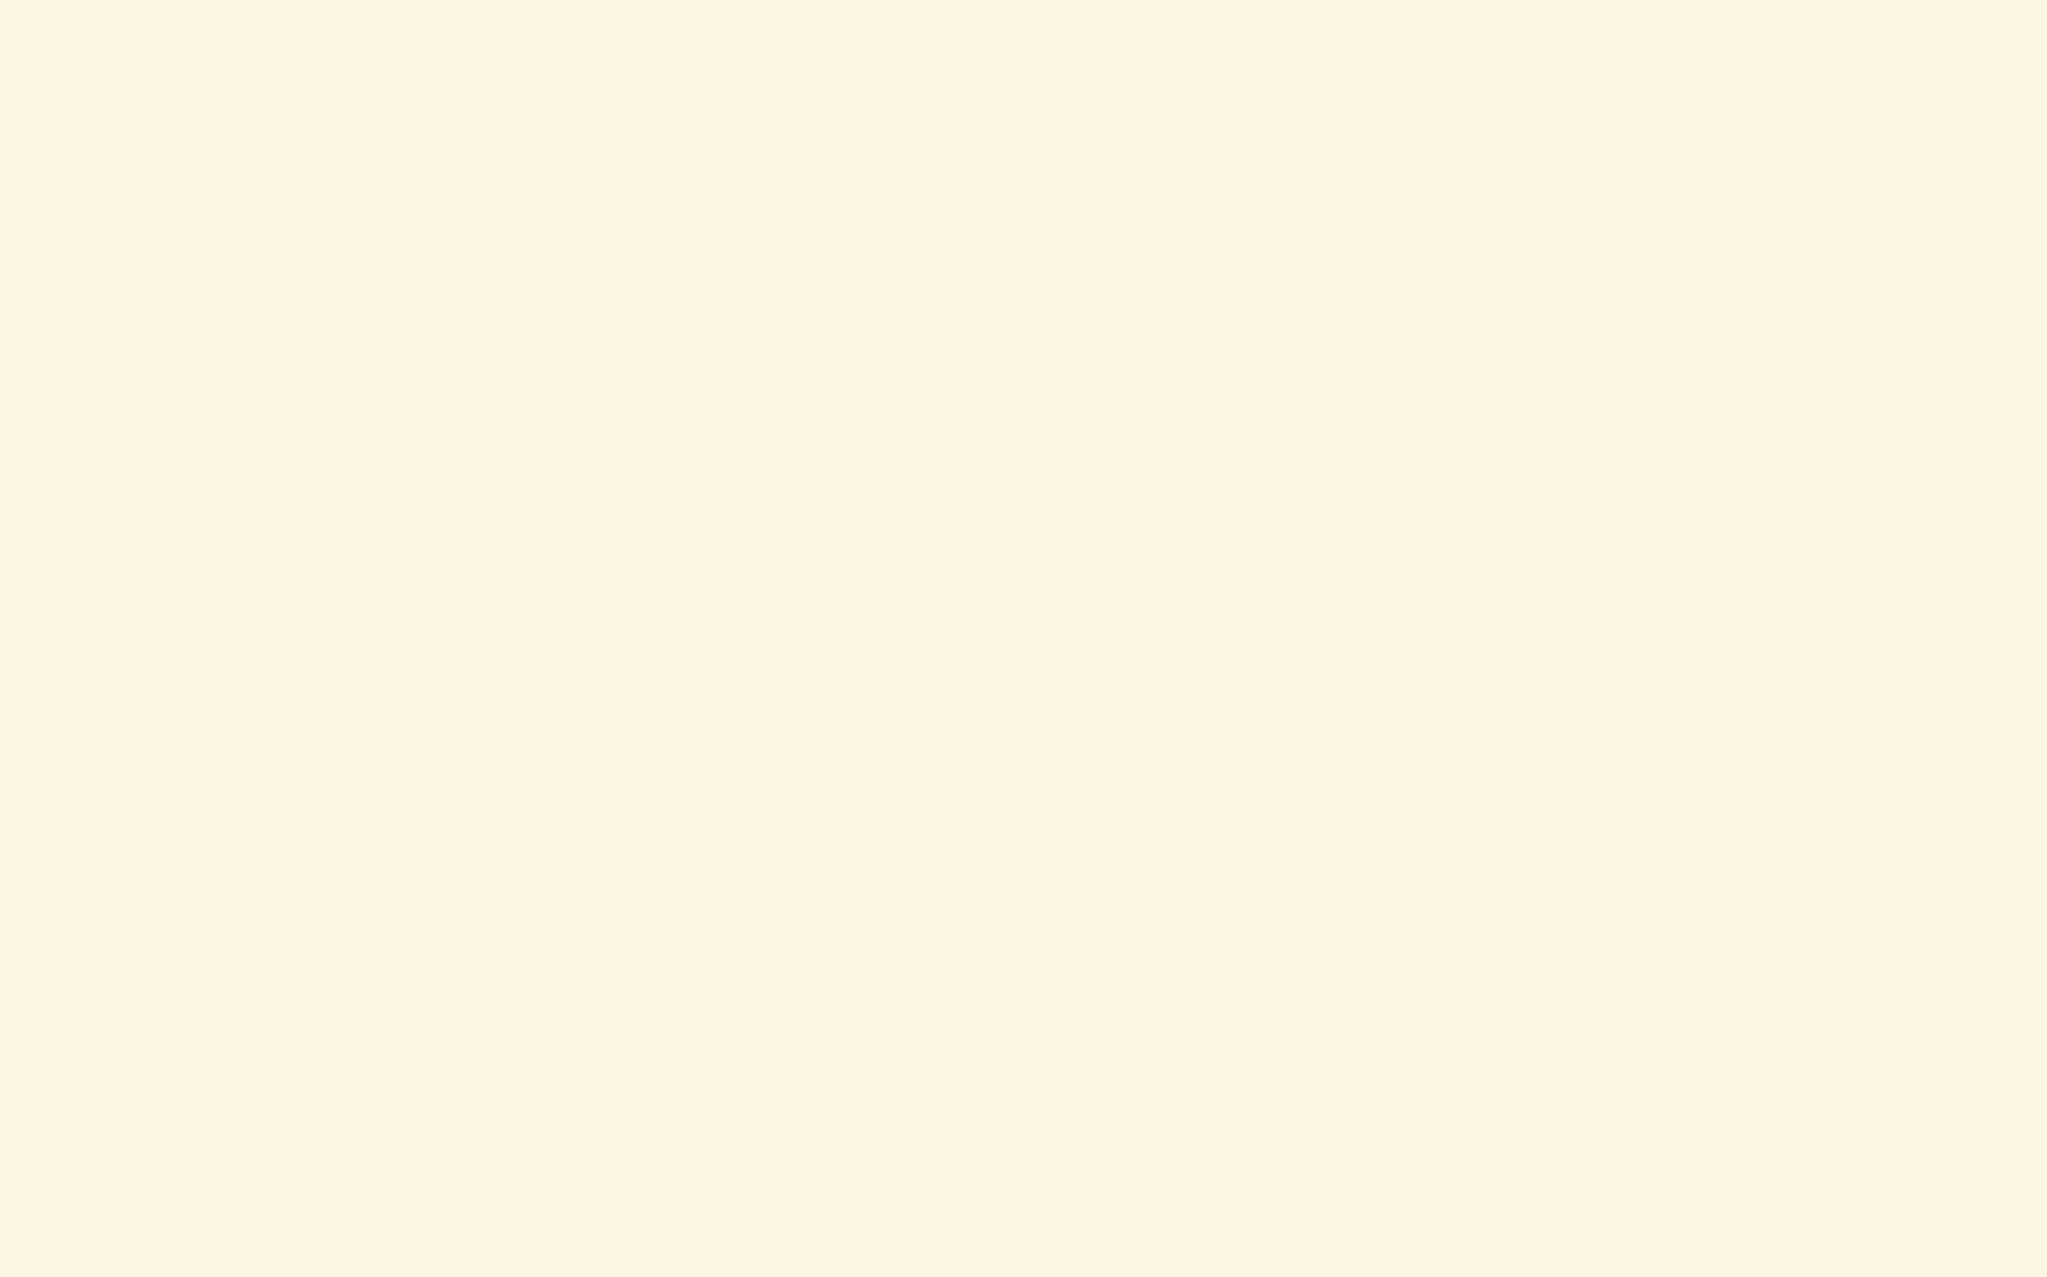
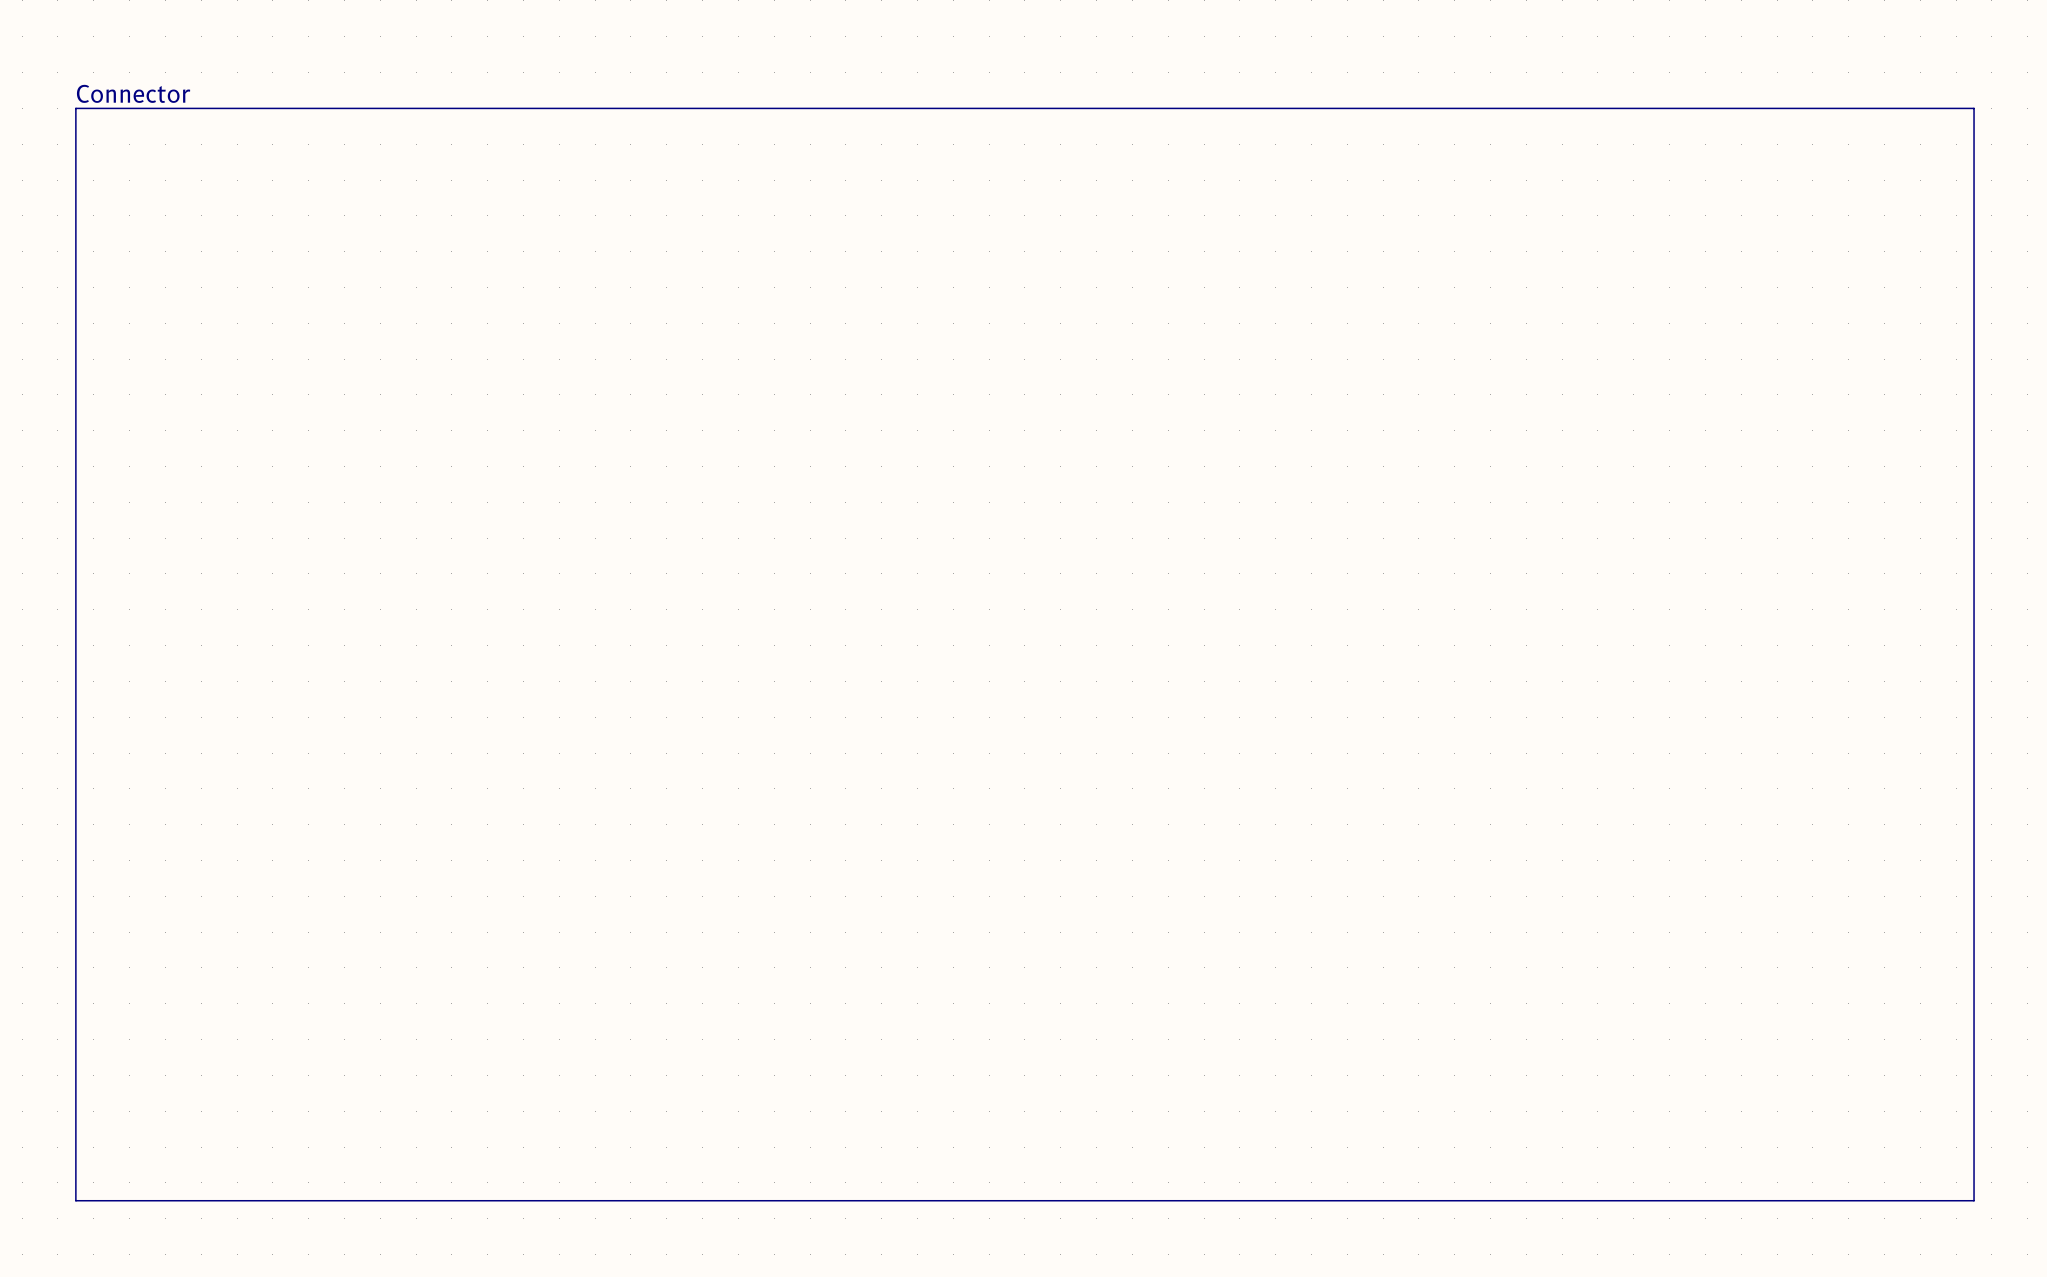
text: none -> Connector (133, 93)
line: none -> (75, 108) (75, 1200) (1974, 1200) (1974, 108) (75, 108)

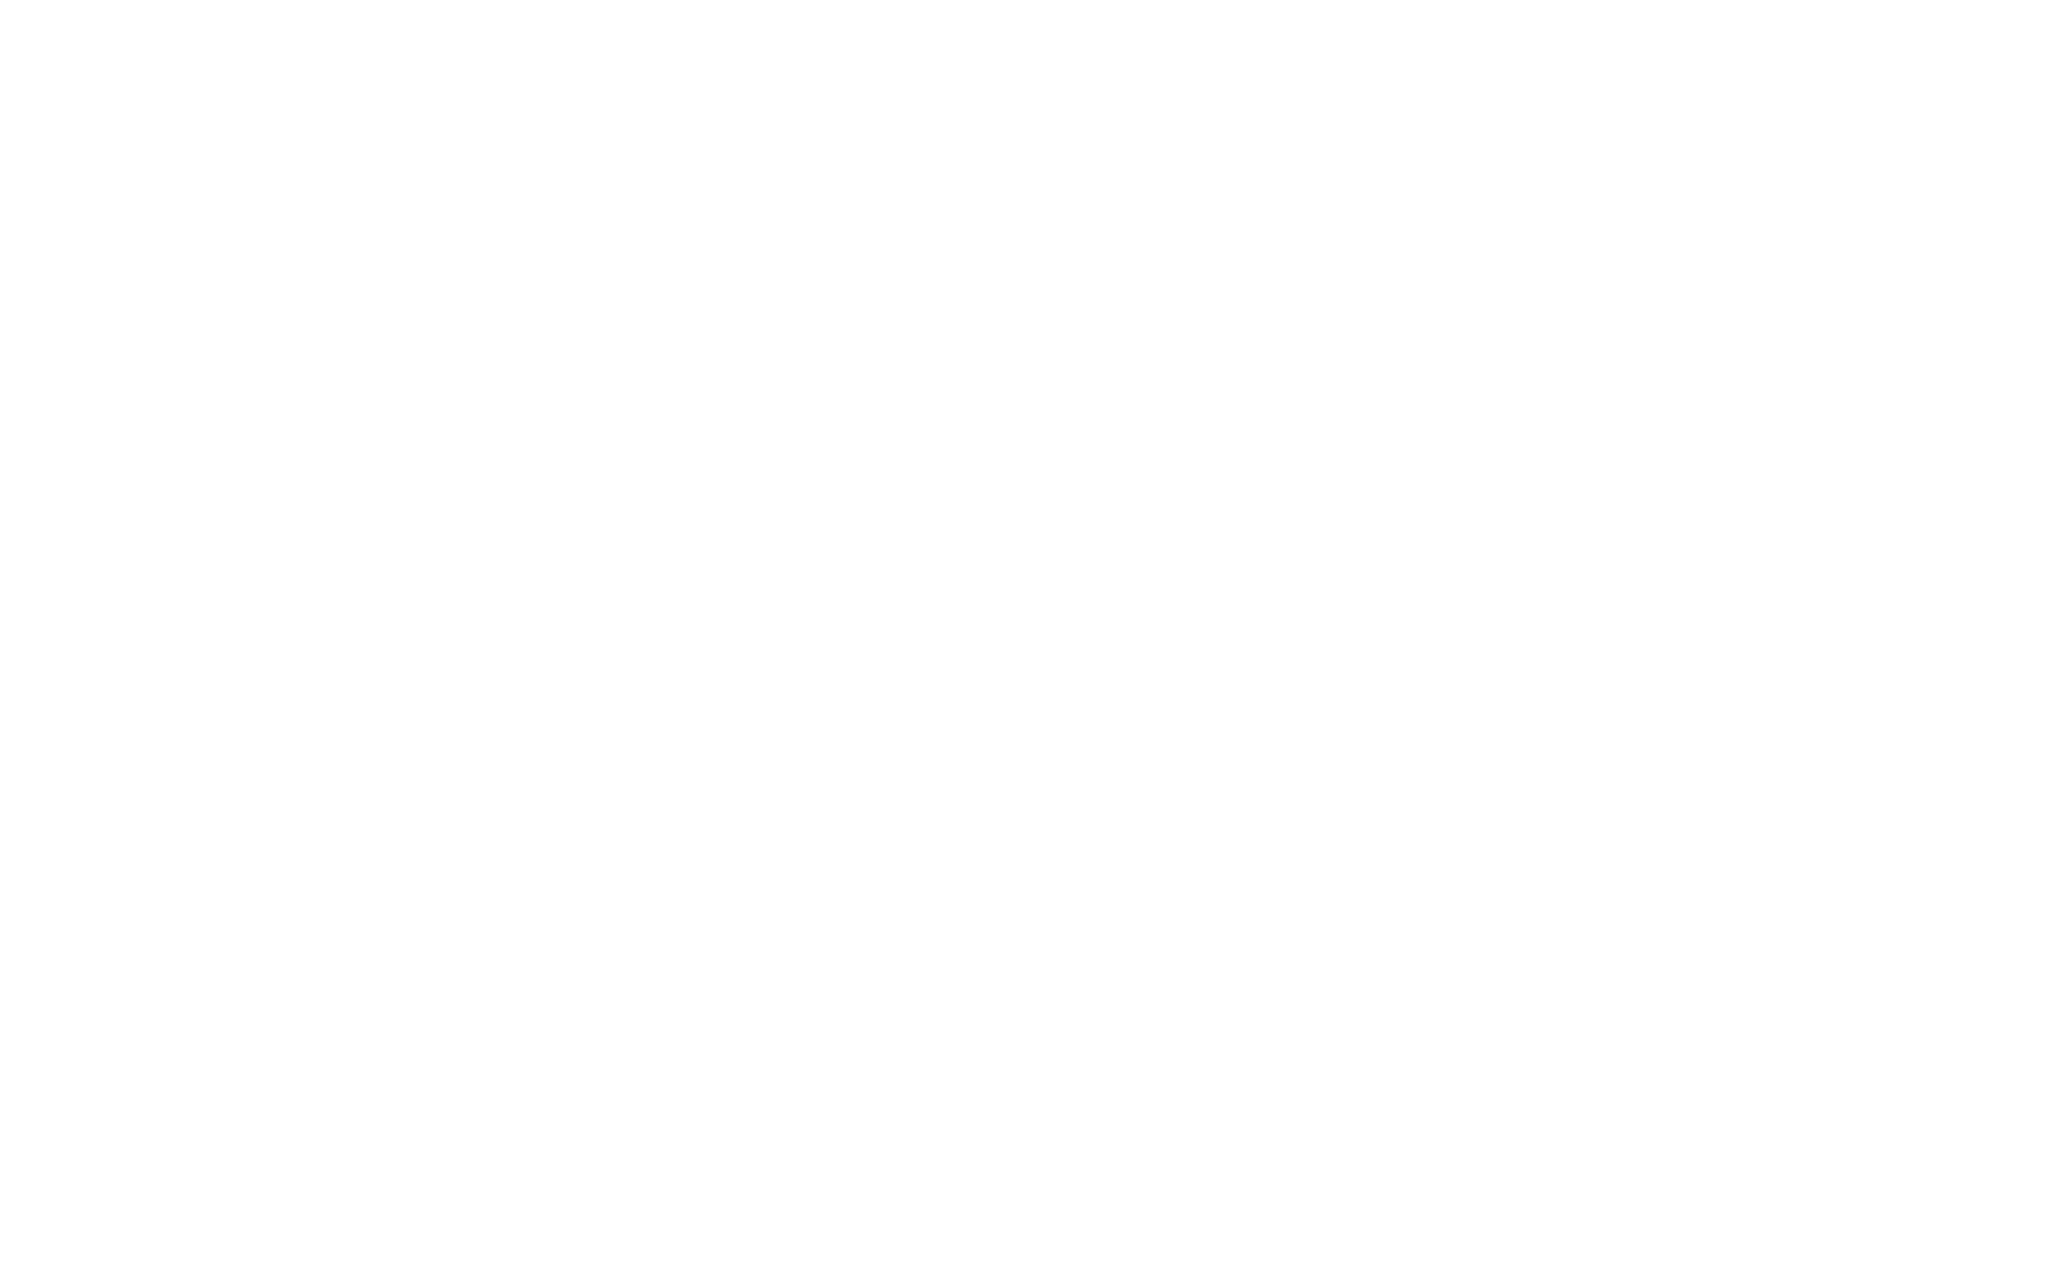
text: Connector (133, 93) -> none
line: (75, 108) (75, 1200) (1974, 1200) (1974, 108) (75, 108) -> none

